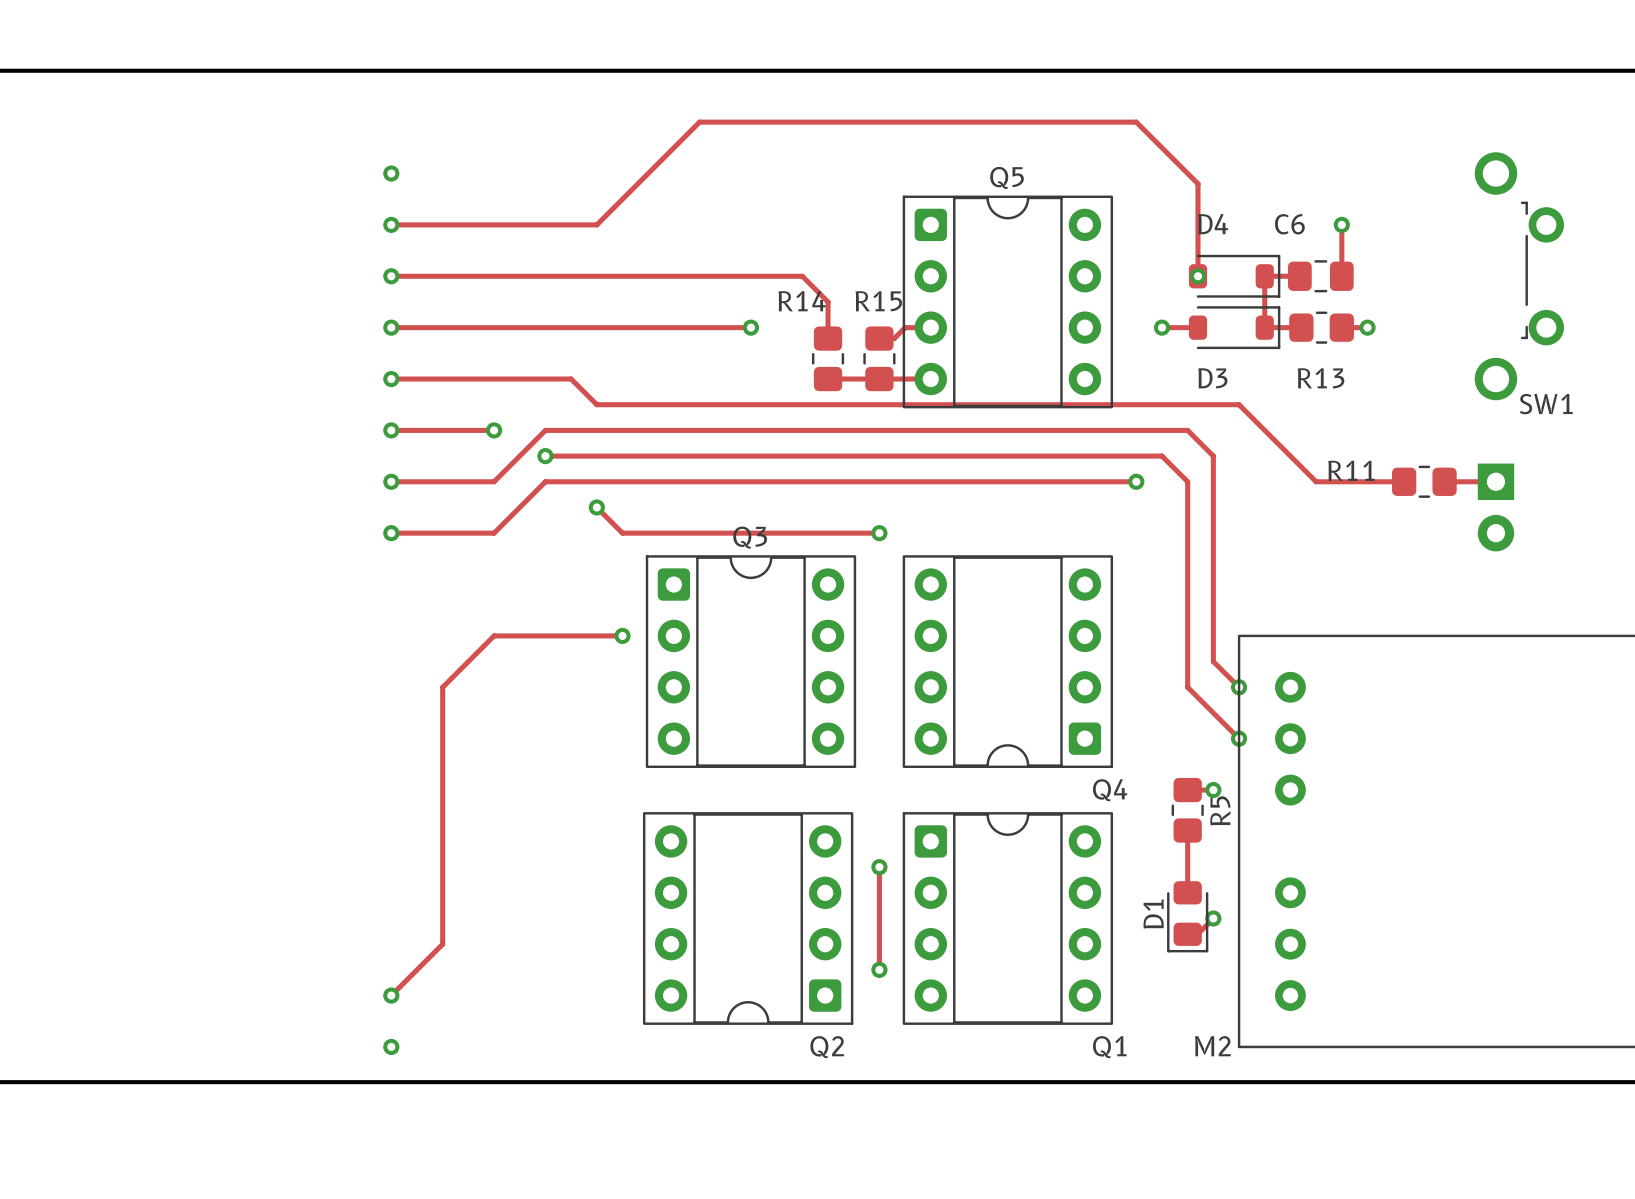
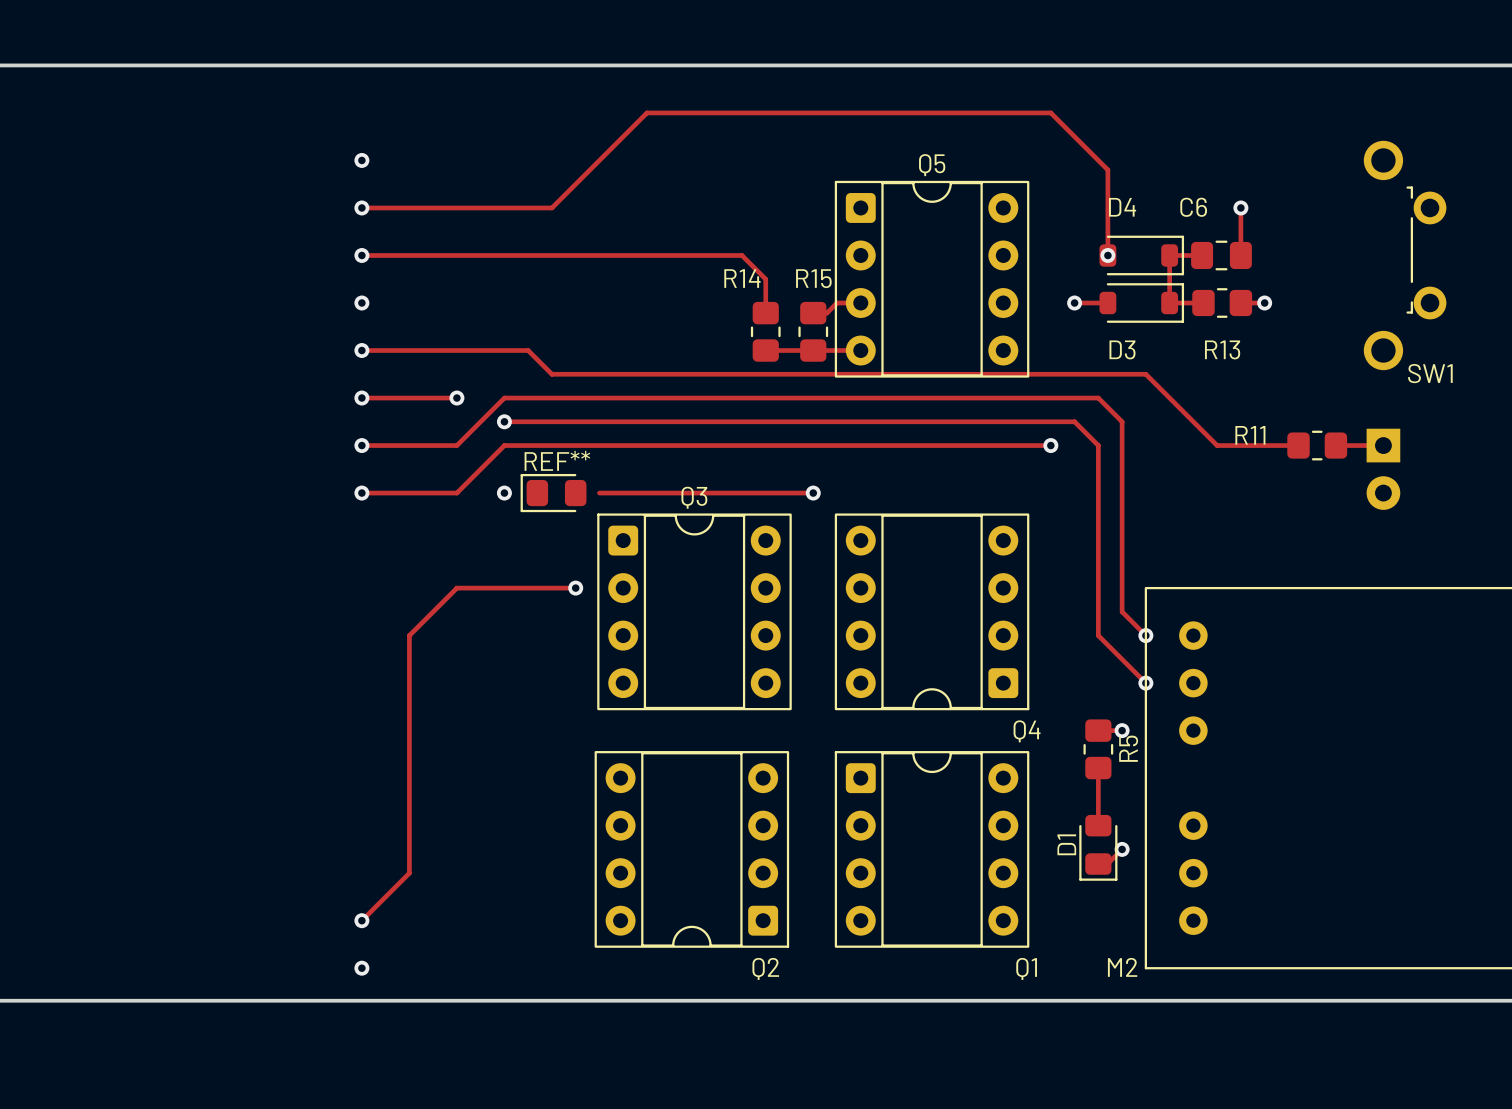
track: (391, 327) (750, 327) -> none
via: (750, 327) -> none
track: (596, 507) (622, 533) (648, 533) -> none
via position: (596, 507) -> (504, 493)
REF**: none -> (553, 493)
track: (879, 867) (879, 969) -> none
via: (879, 867) -> none
via: (879, 969) -> none

